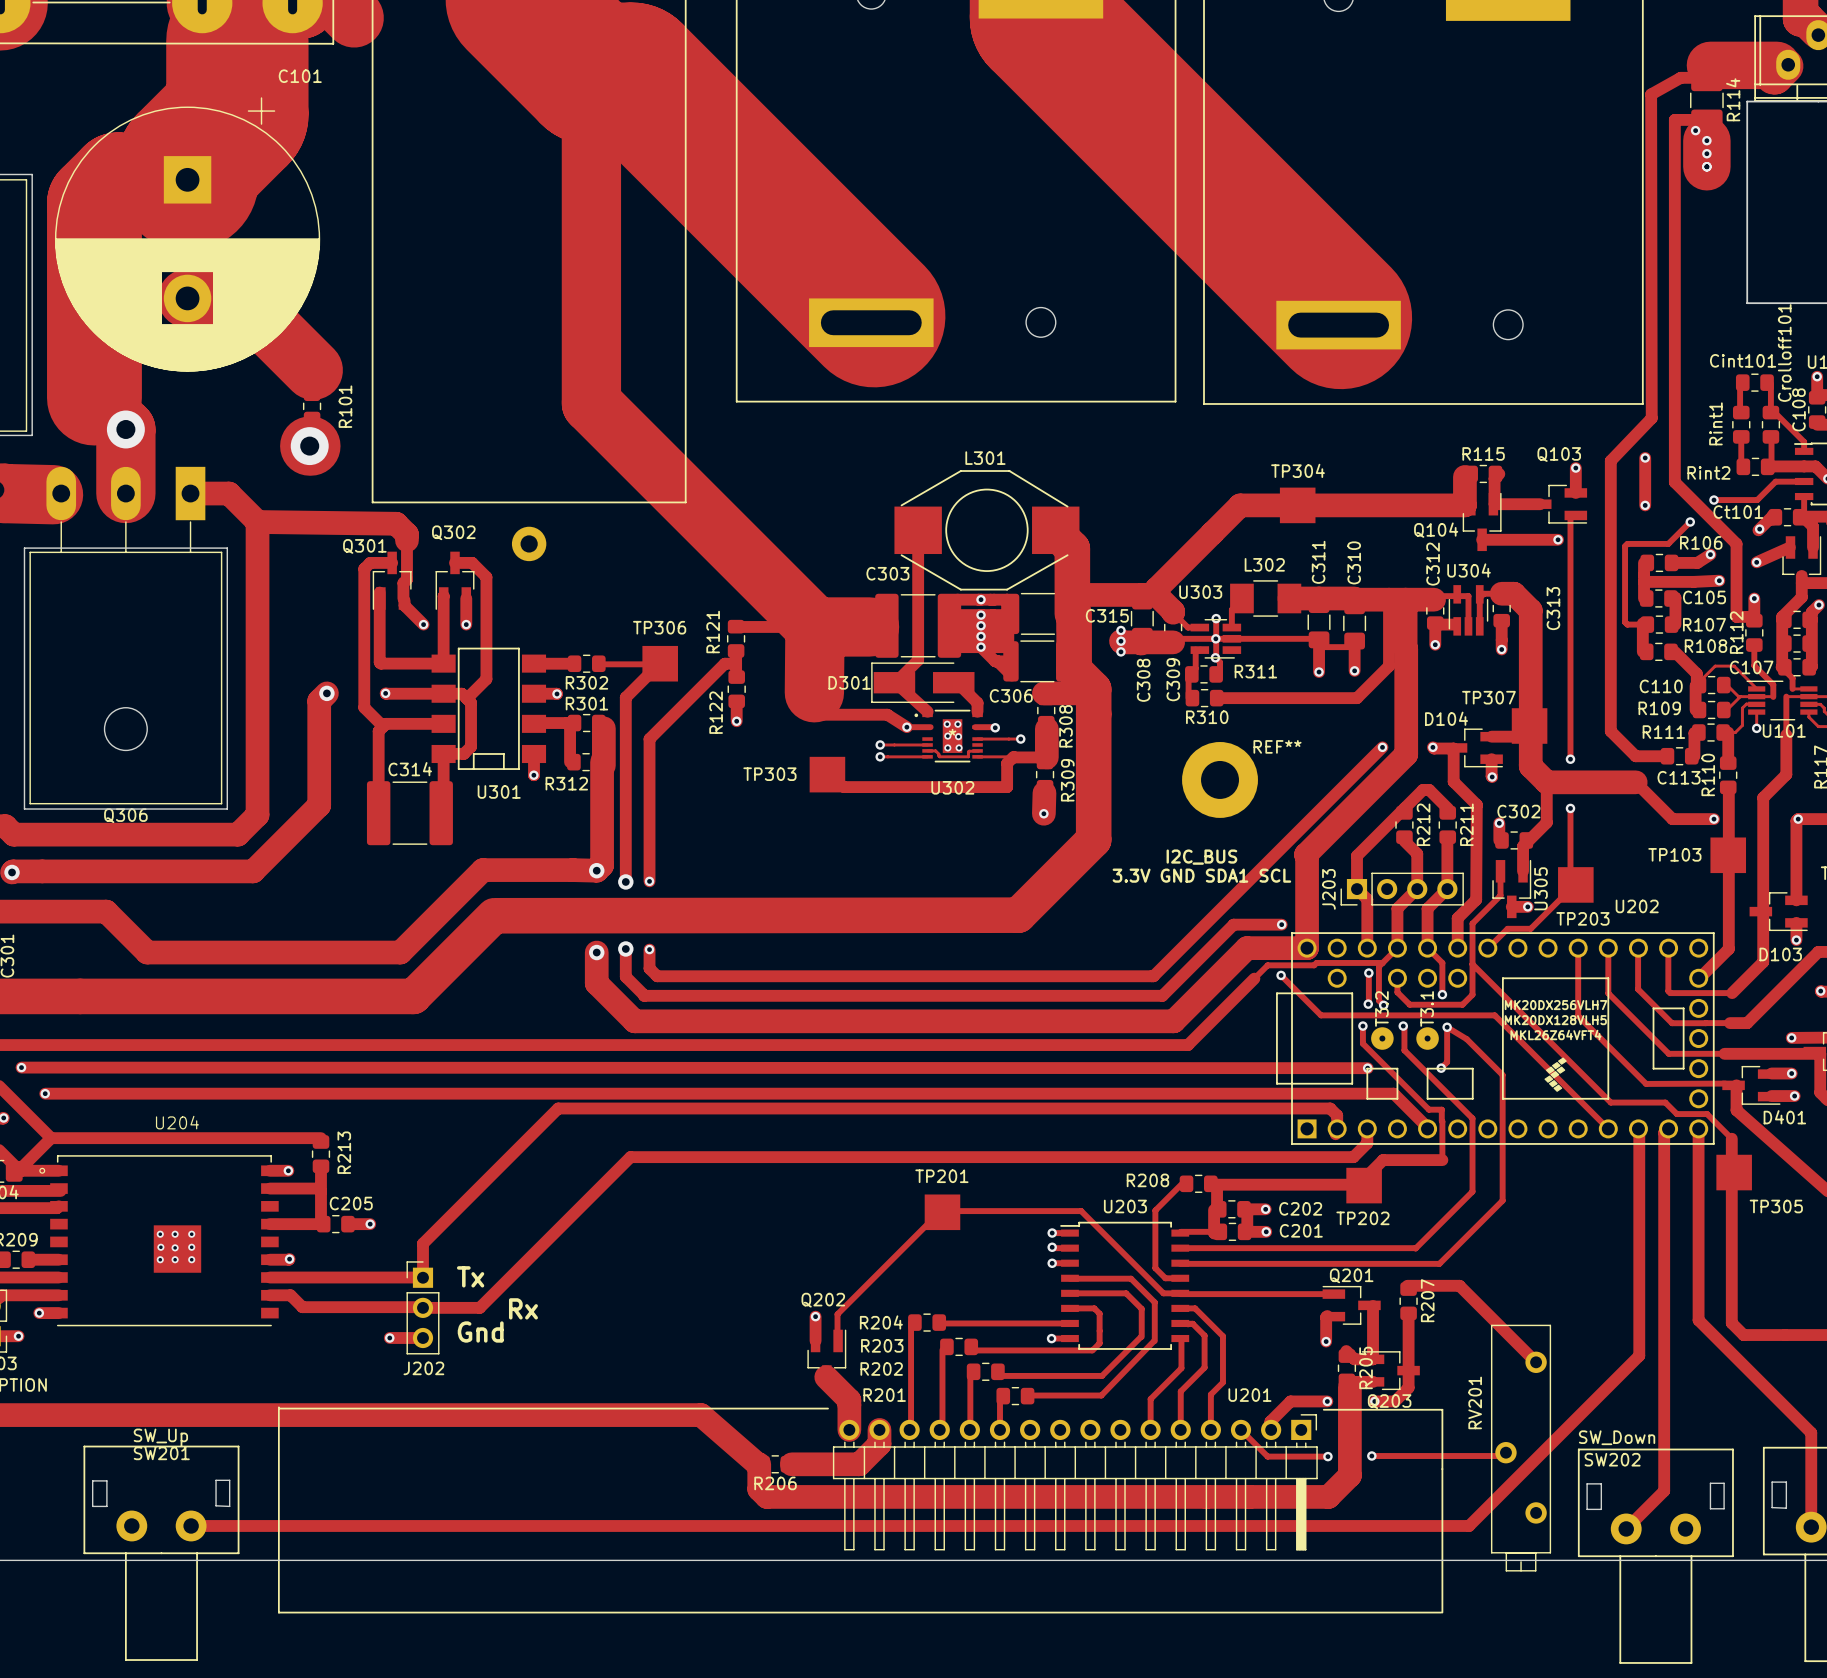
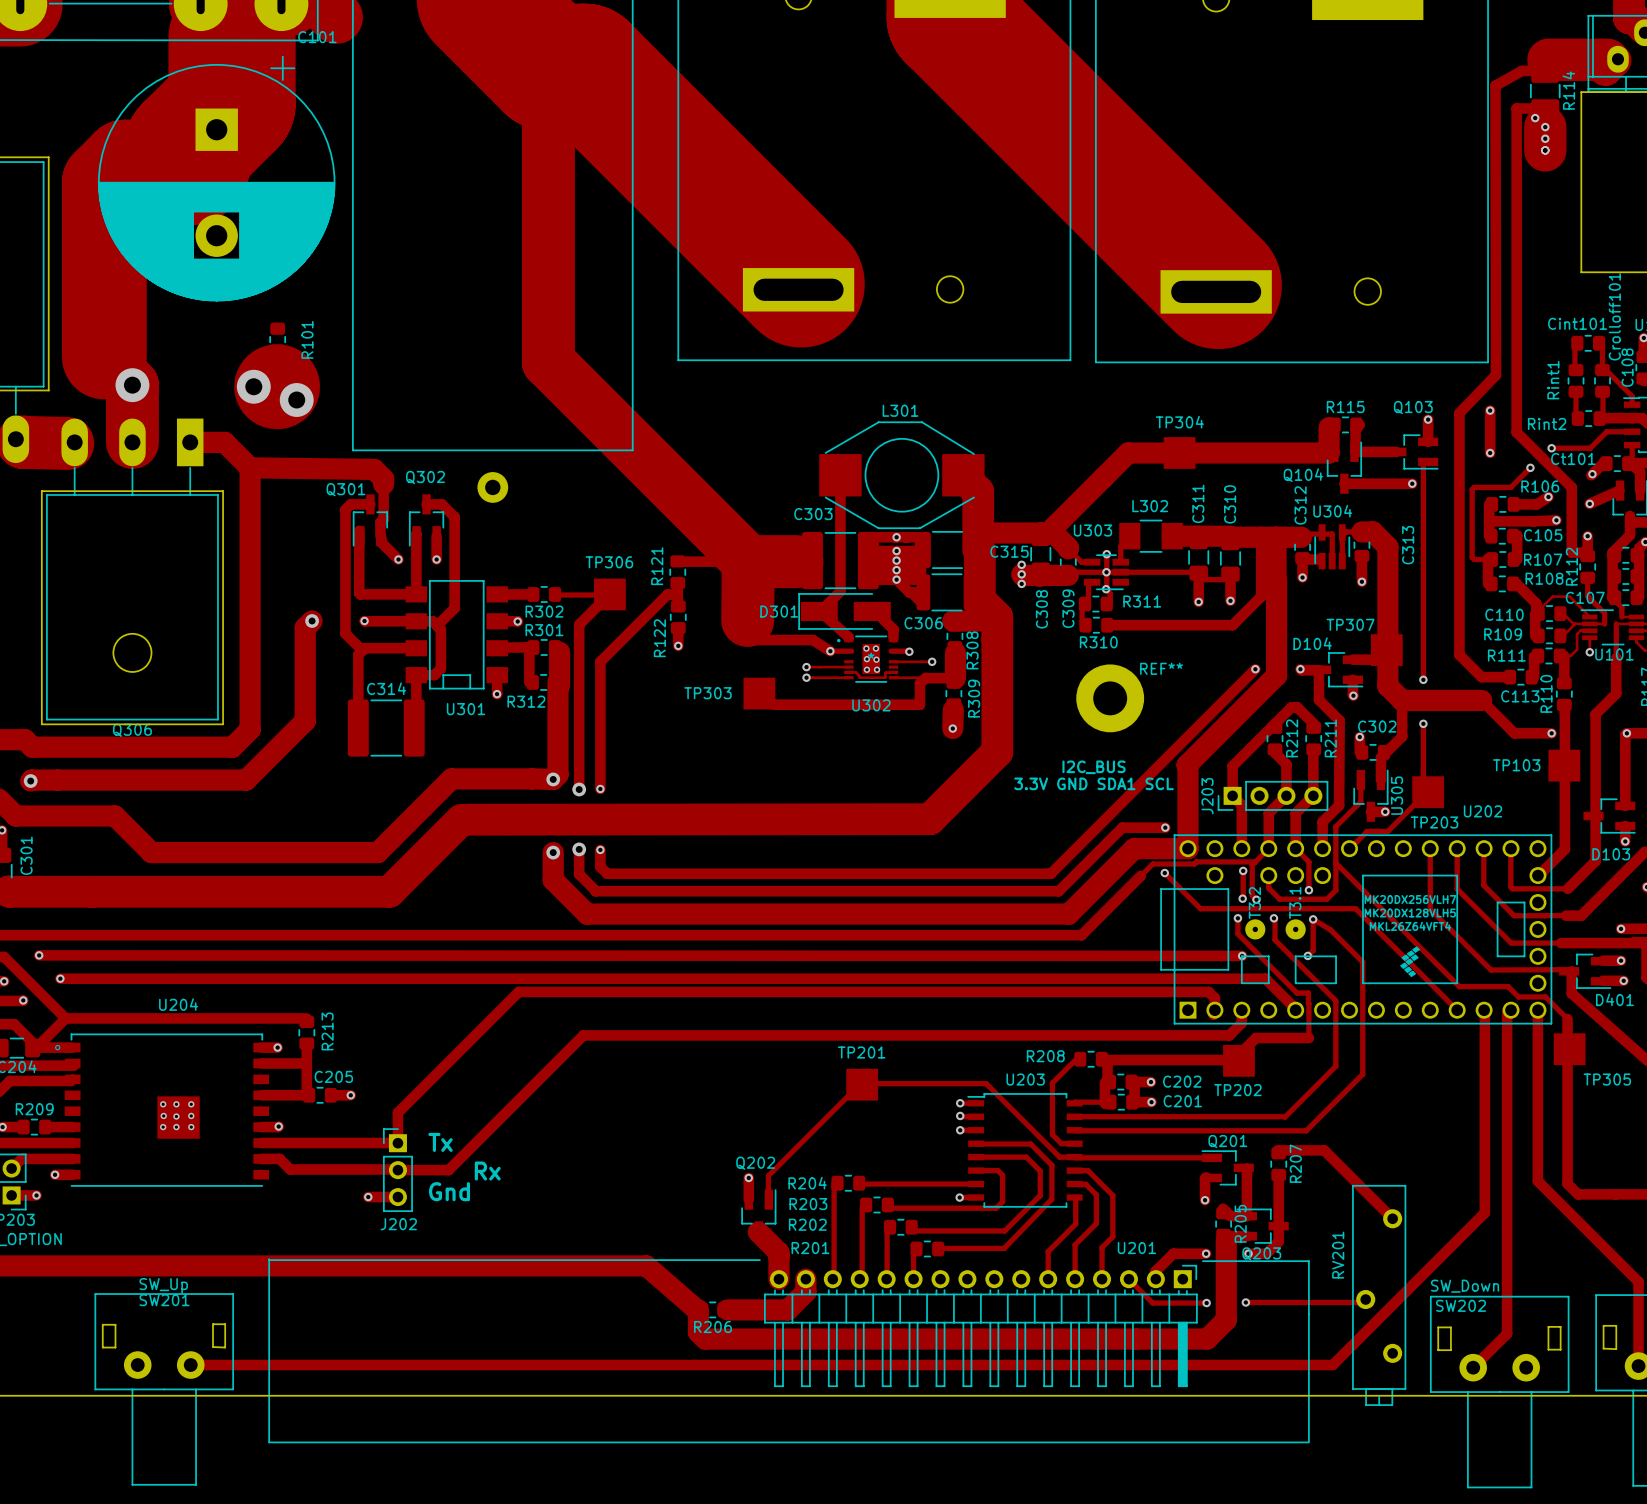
C101 position: (187, 234) -> (216, 178)
track: (187, 298) (241, 298) (313, 370) -> none
R101 position: (312, 406) -> (277, 339)
via: none -> (253, 386)
track: (309, 446) (310, 446) -> (276, 386) (277, 386)

